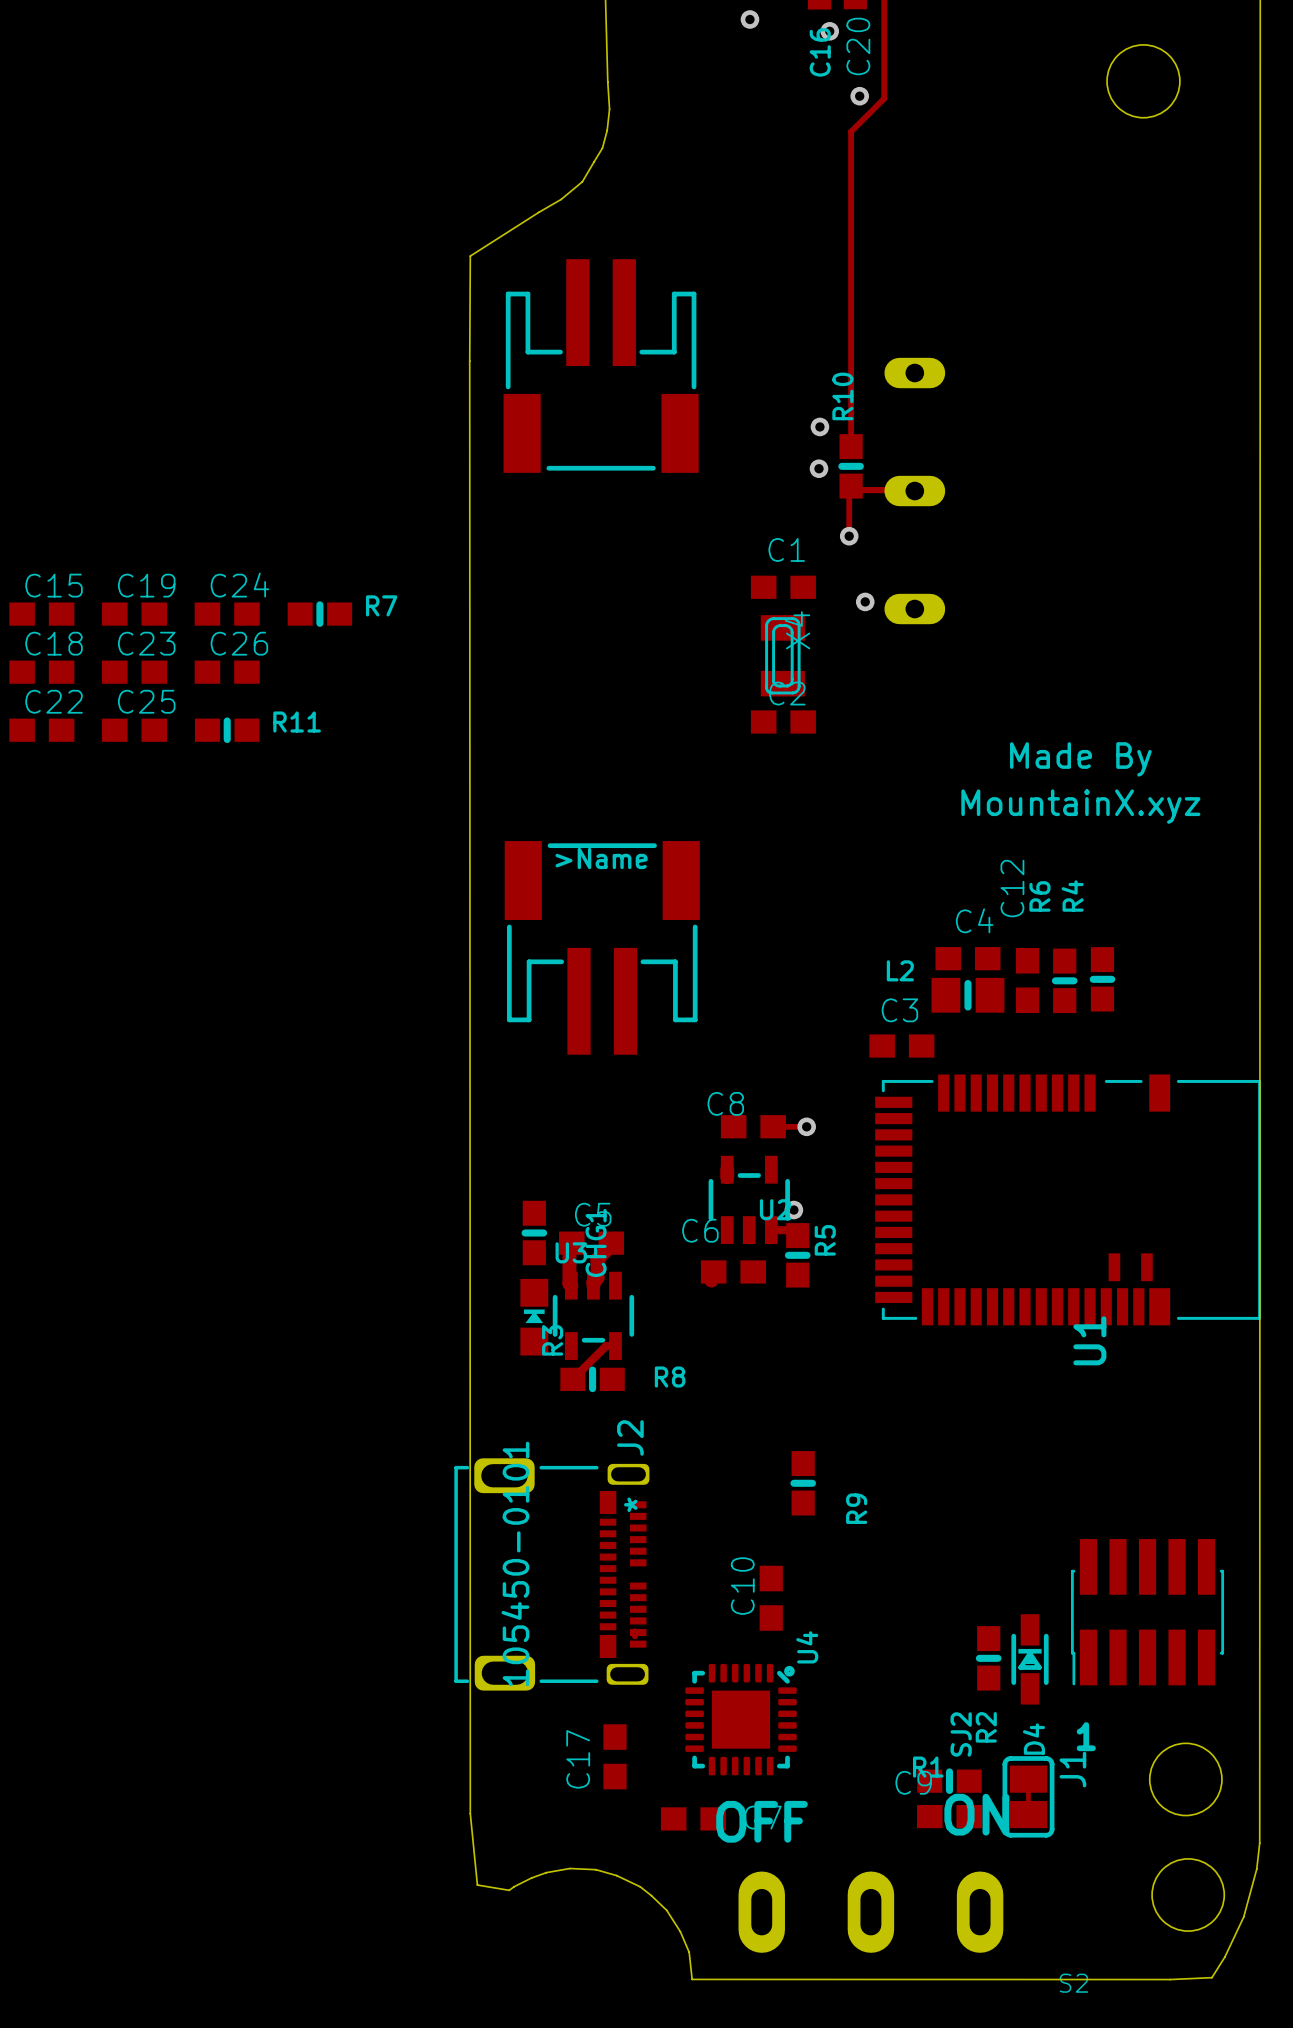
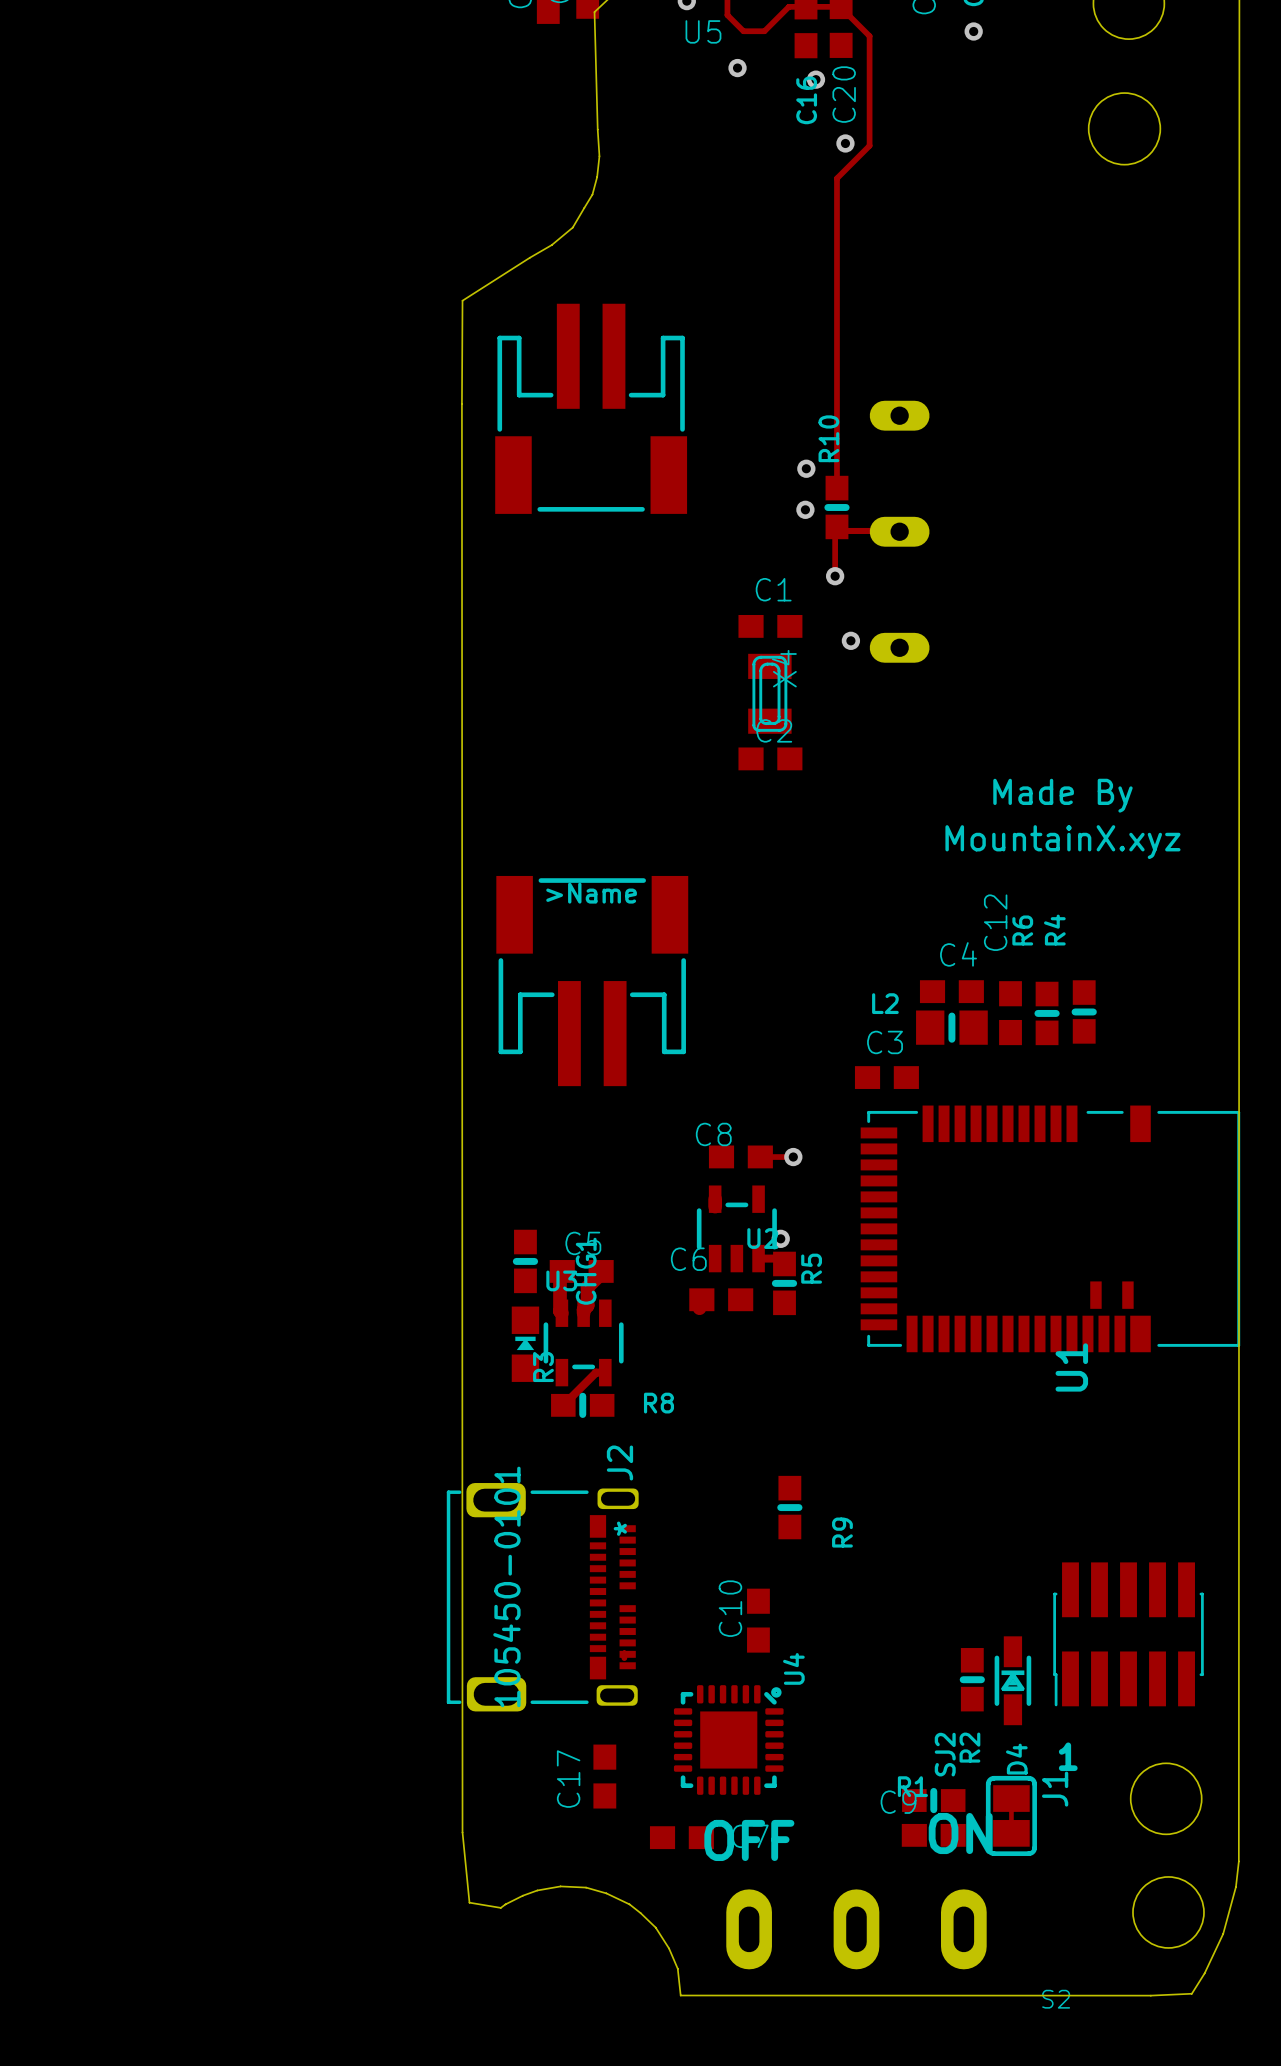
C15: (41, 614) -> none
C19: (134, 614) -> none
C24: (227, 614) -> none
R7: (319, 614) -> none
C18: (41, 672) -> none
C23: (134, 672) -> none
C26: (227, 672) -> none
C22: (41, 730) -> none
C25: (134, 730) -> none
R11: (227, 730) -> none

